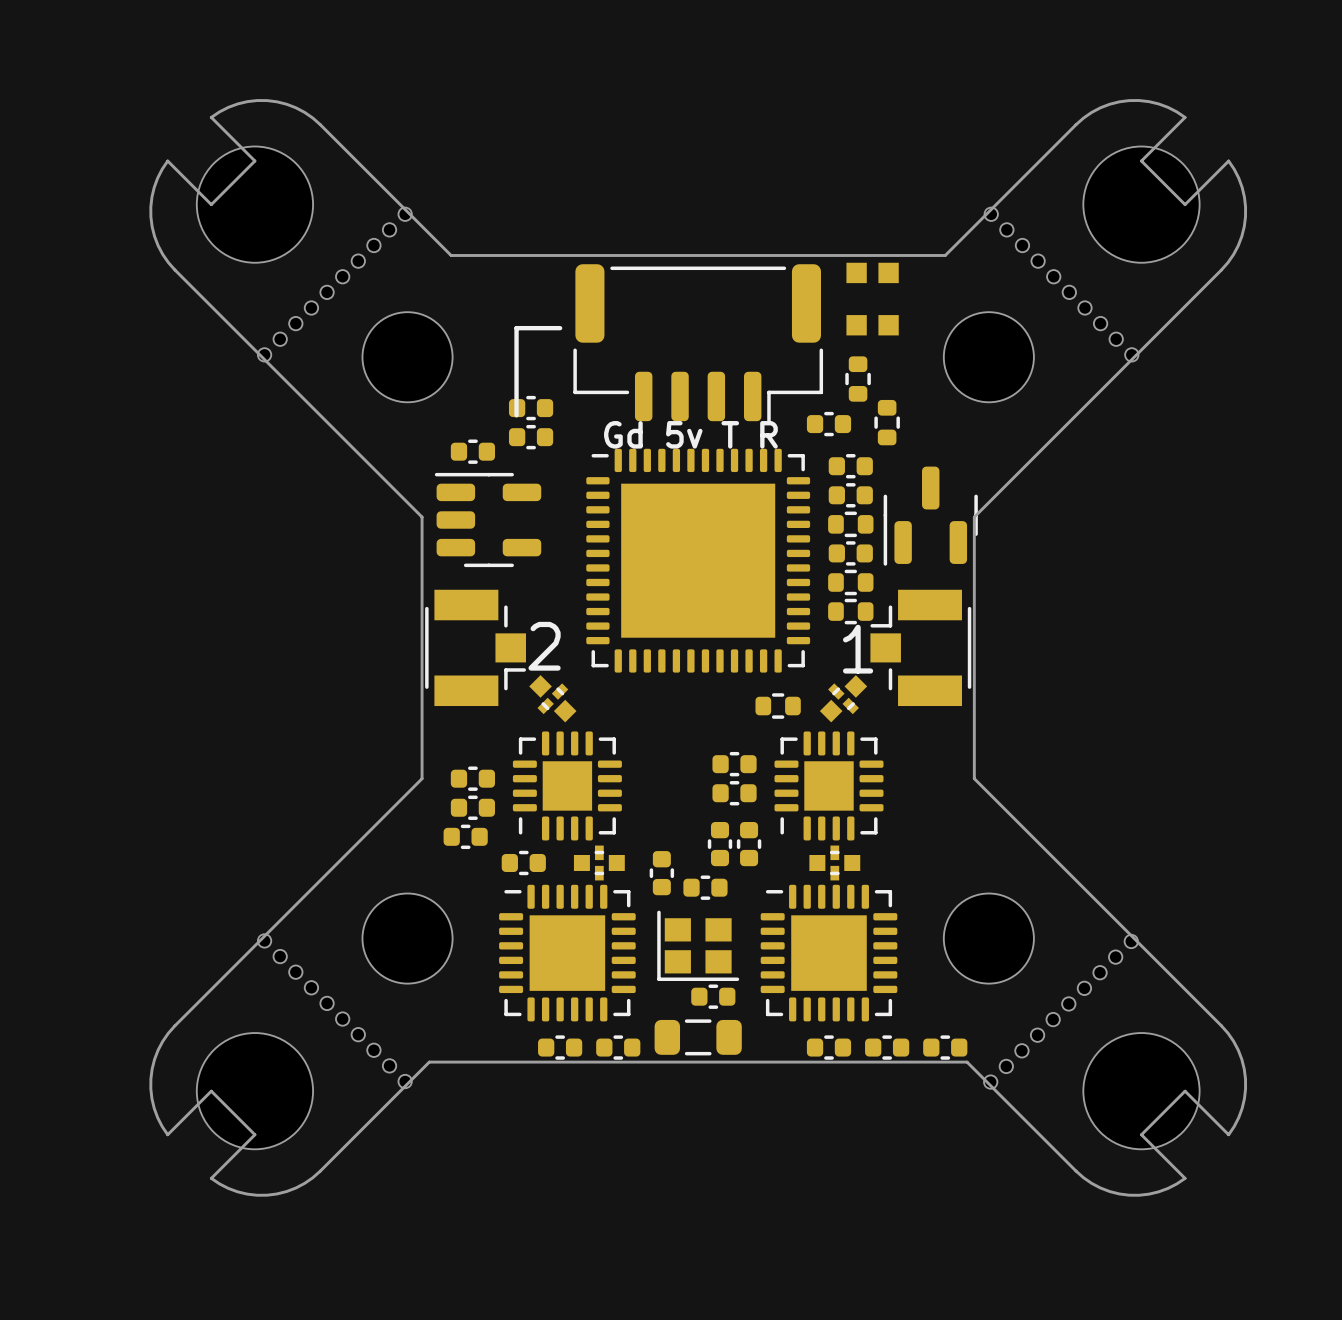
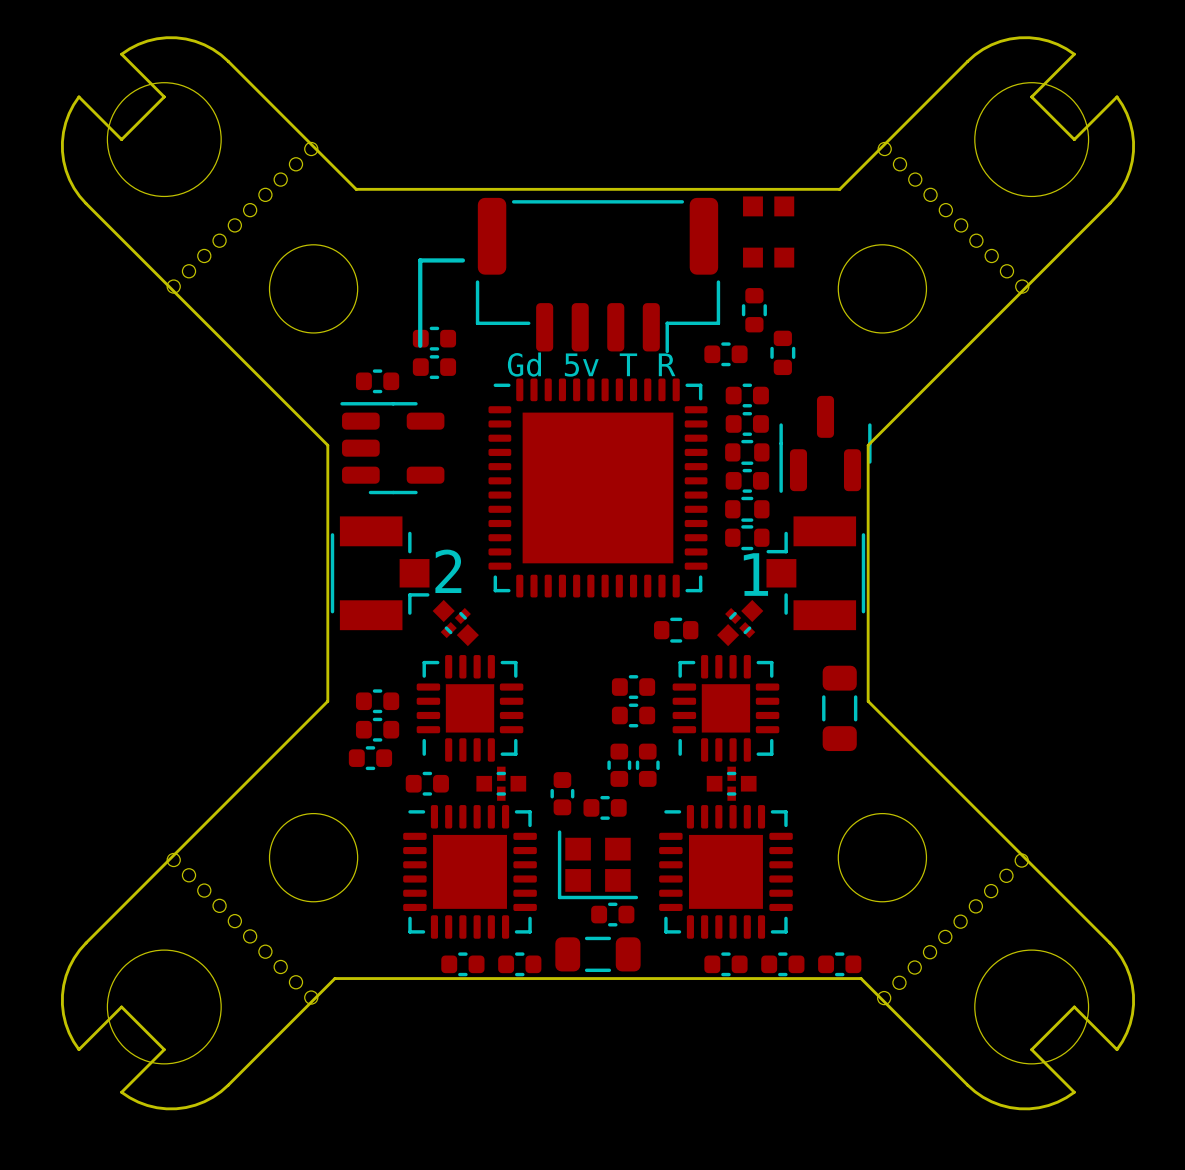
part: none -> (839, 708)

